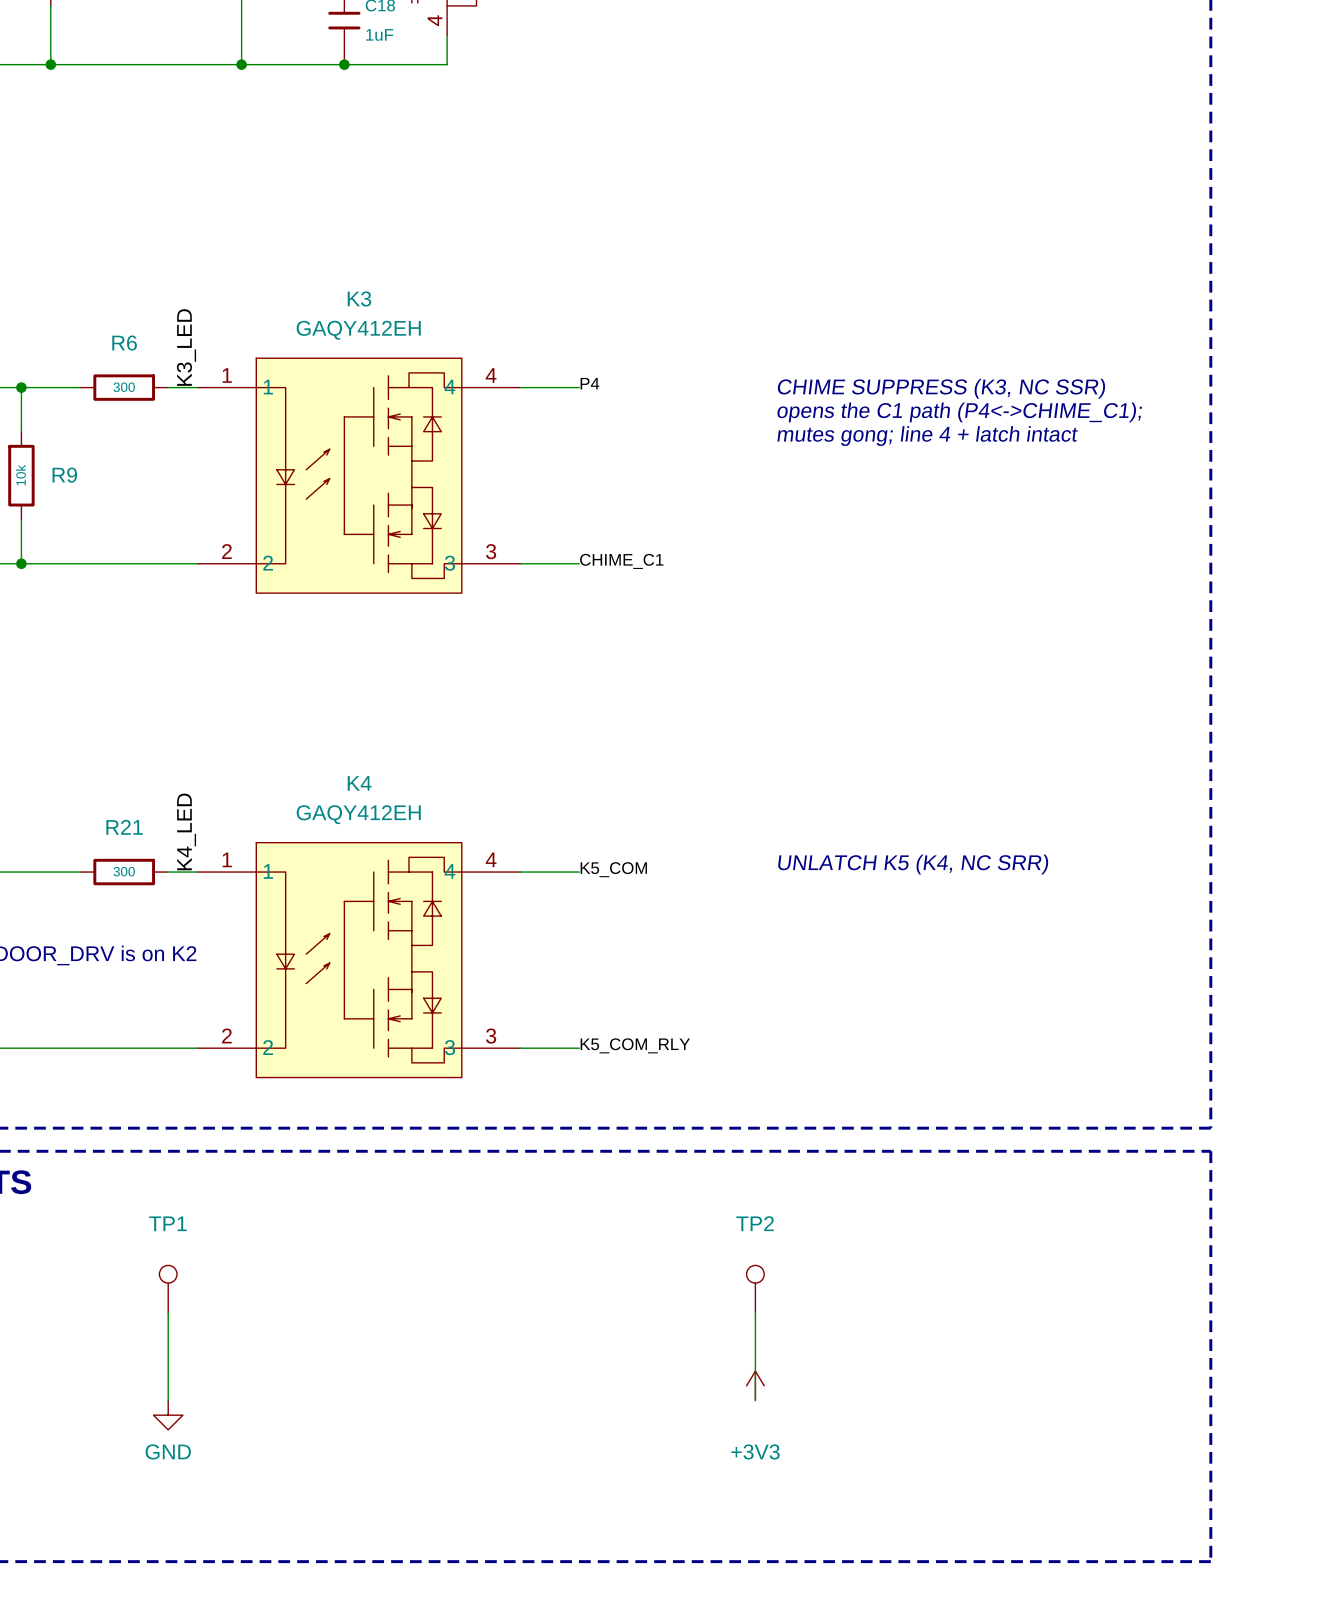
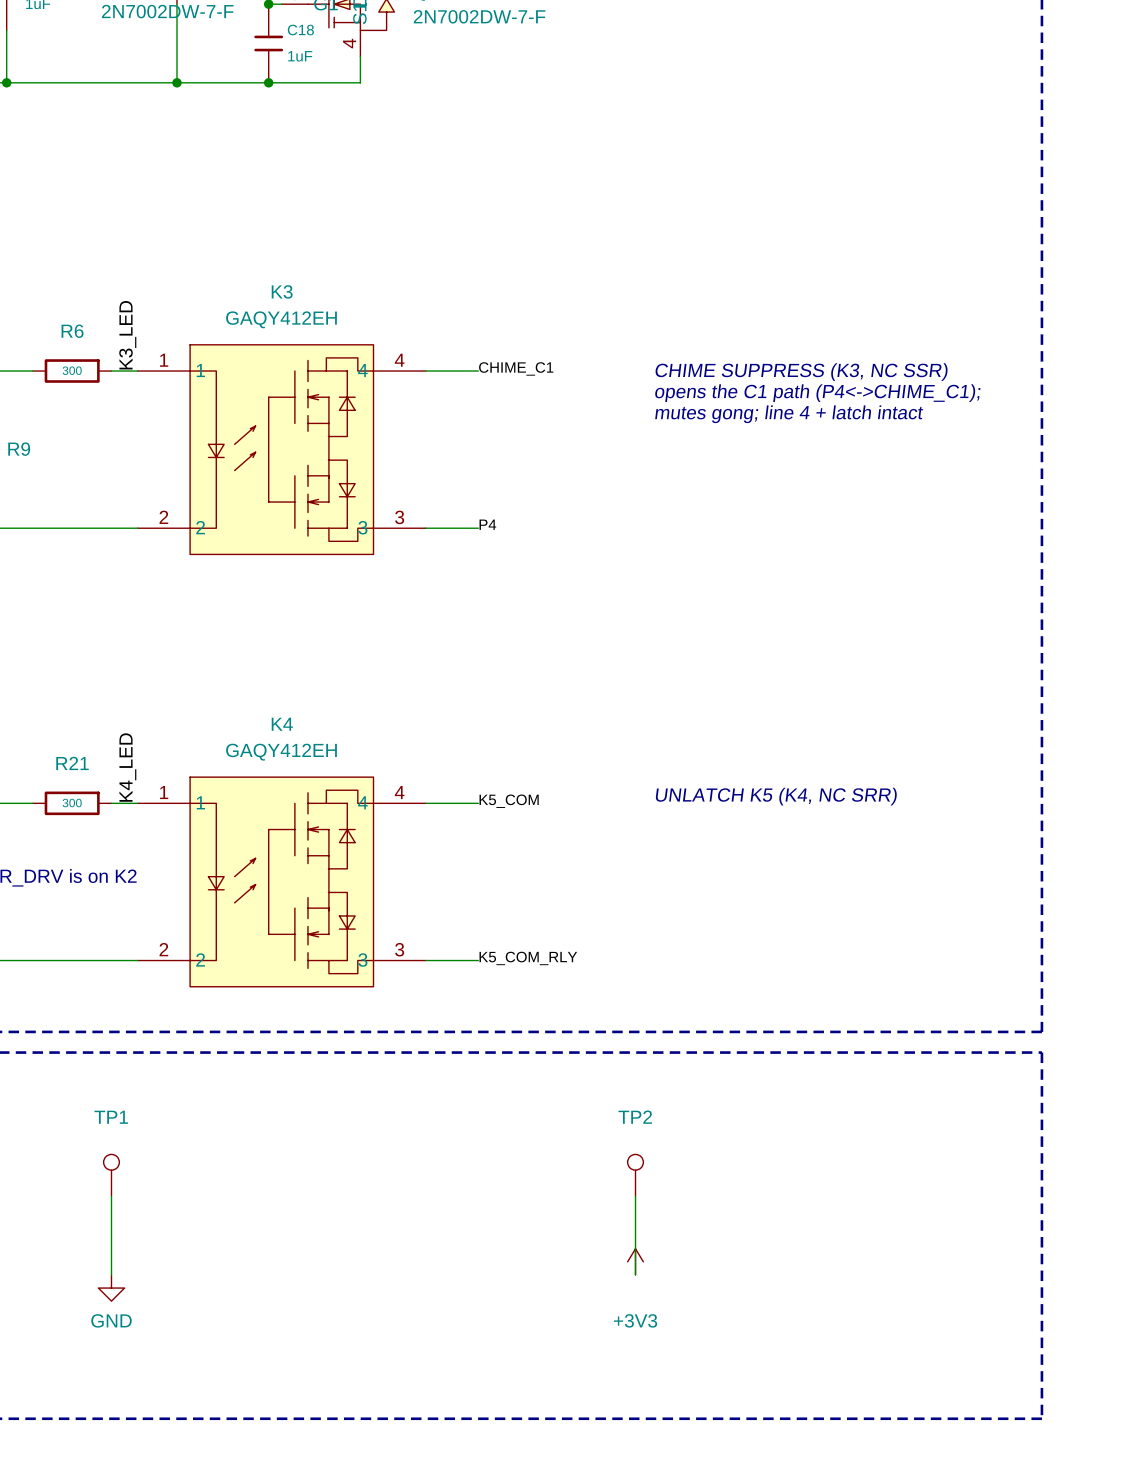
label: P4 (589, 383) -> CHIME_C1 (516, 368)
label: CHIME_C1 (621, 561) -> P4 (487, 524)

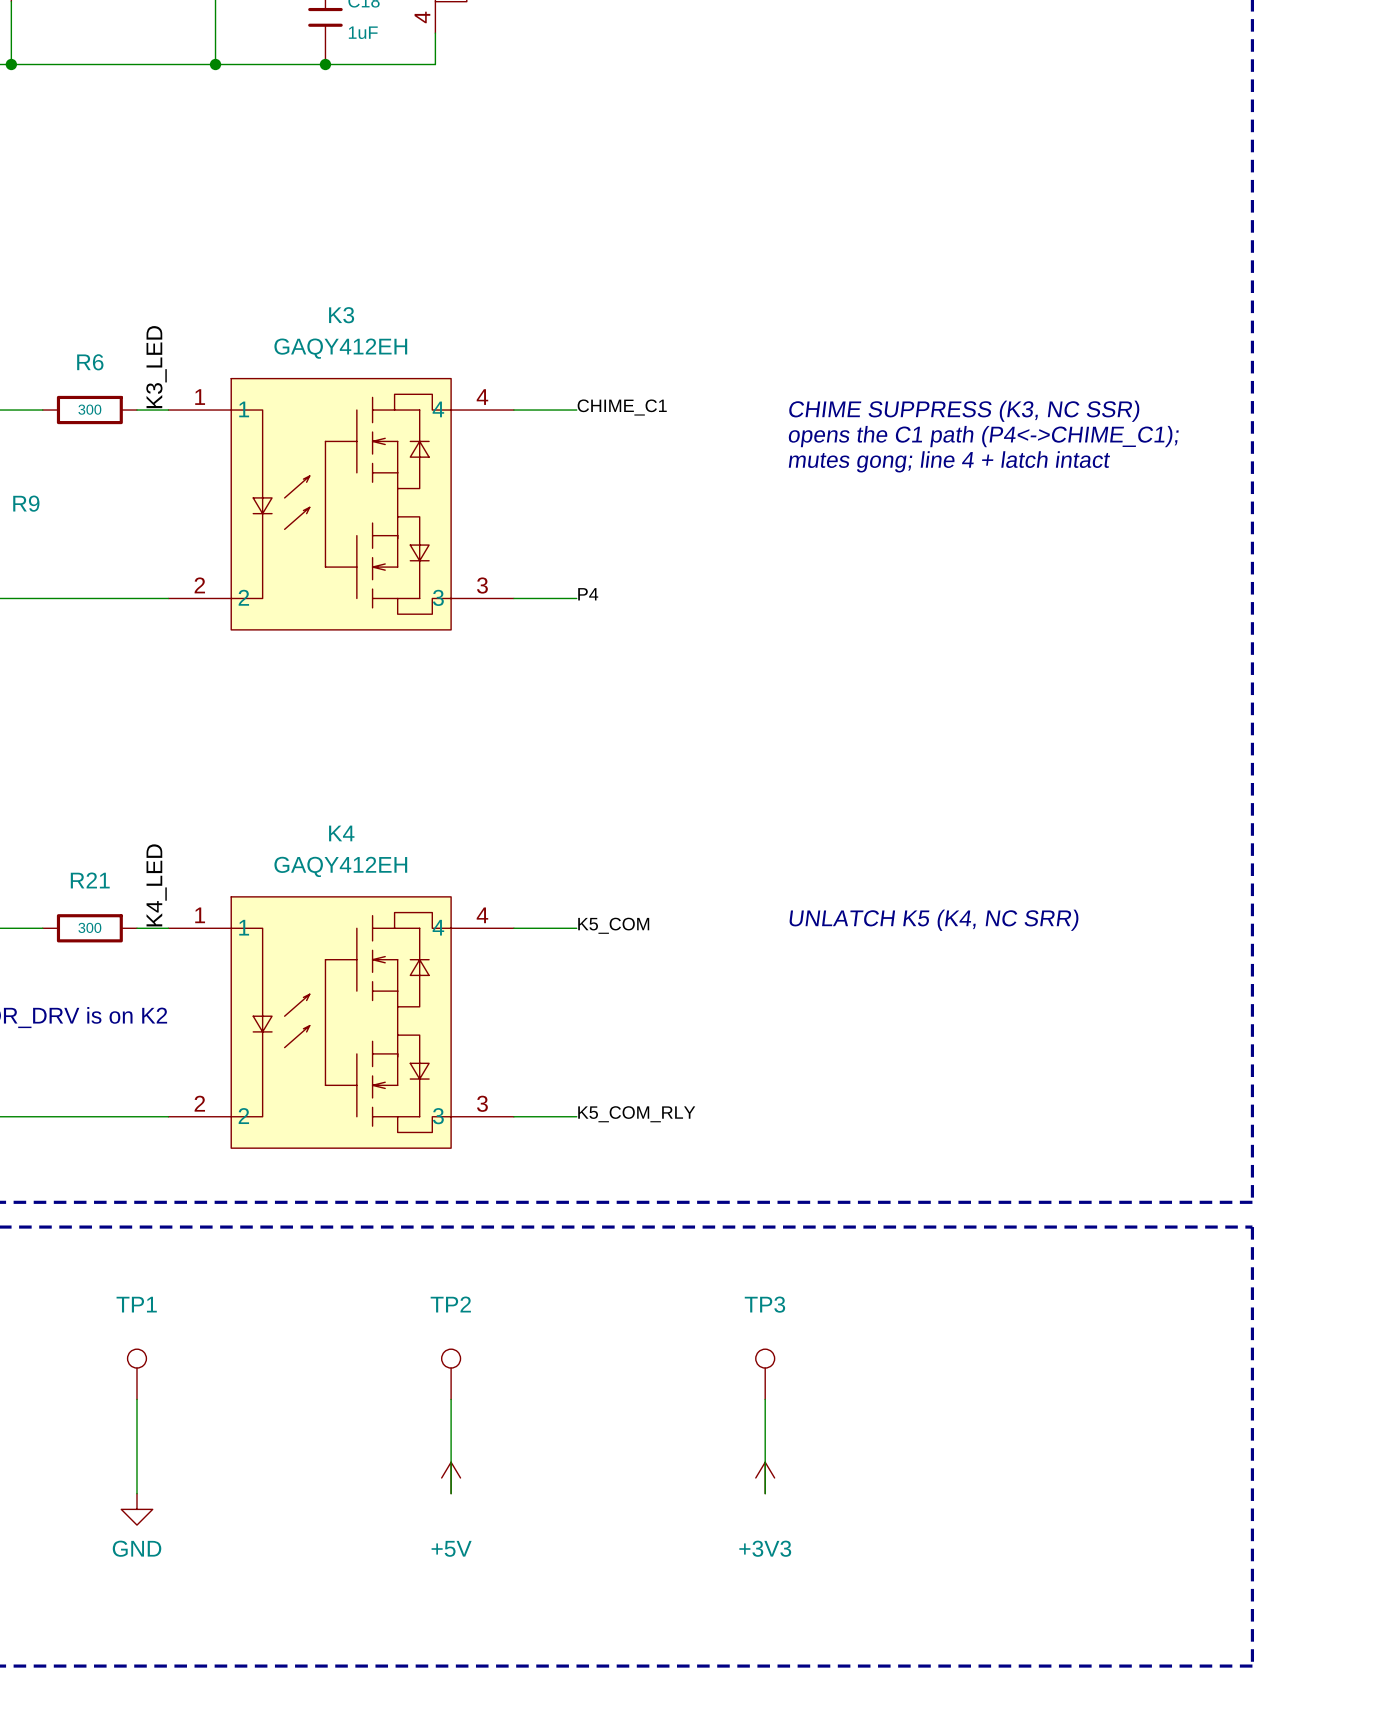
TP2 name: TP2 (635, 1117) -> TP3 (764, 1304)
TP2: none -> (451, 1374)
wire: none -> (451, 1399) (451, 1493)
power symbol: none -> +5V (451, 1477)

